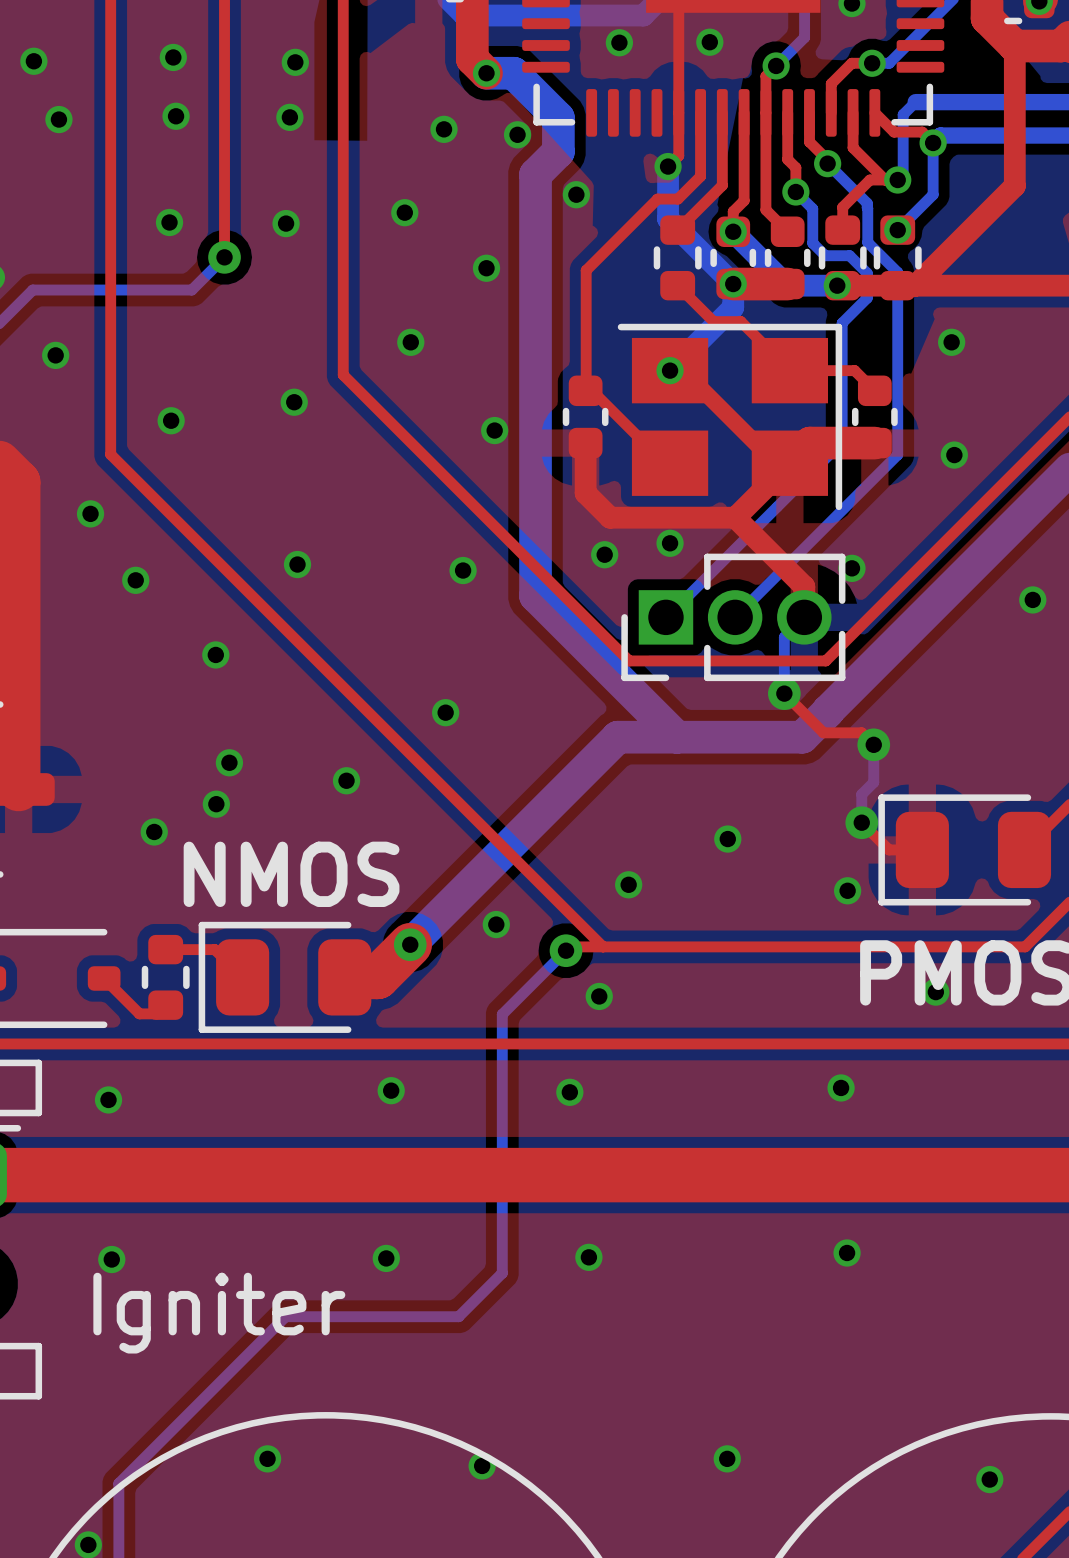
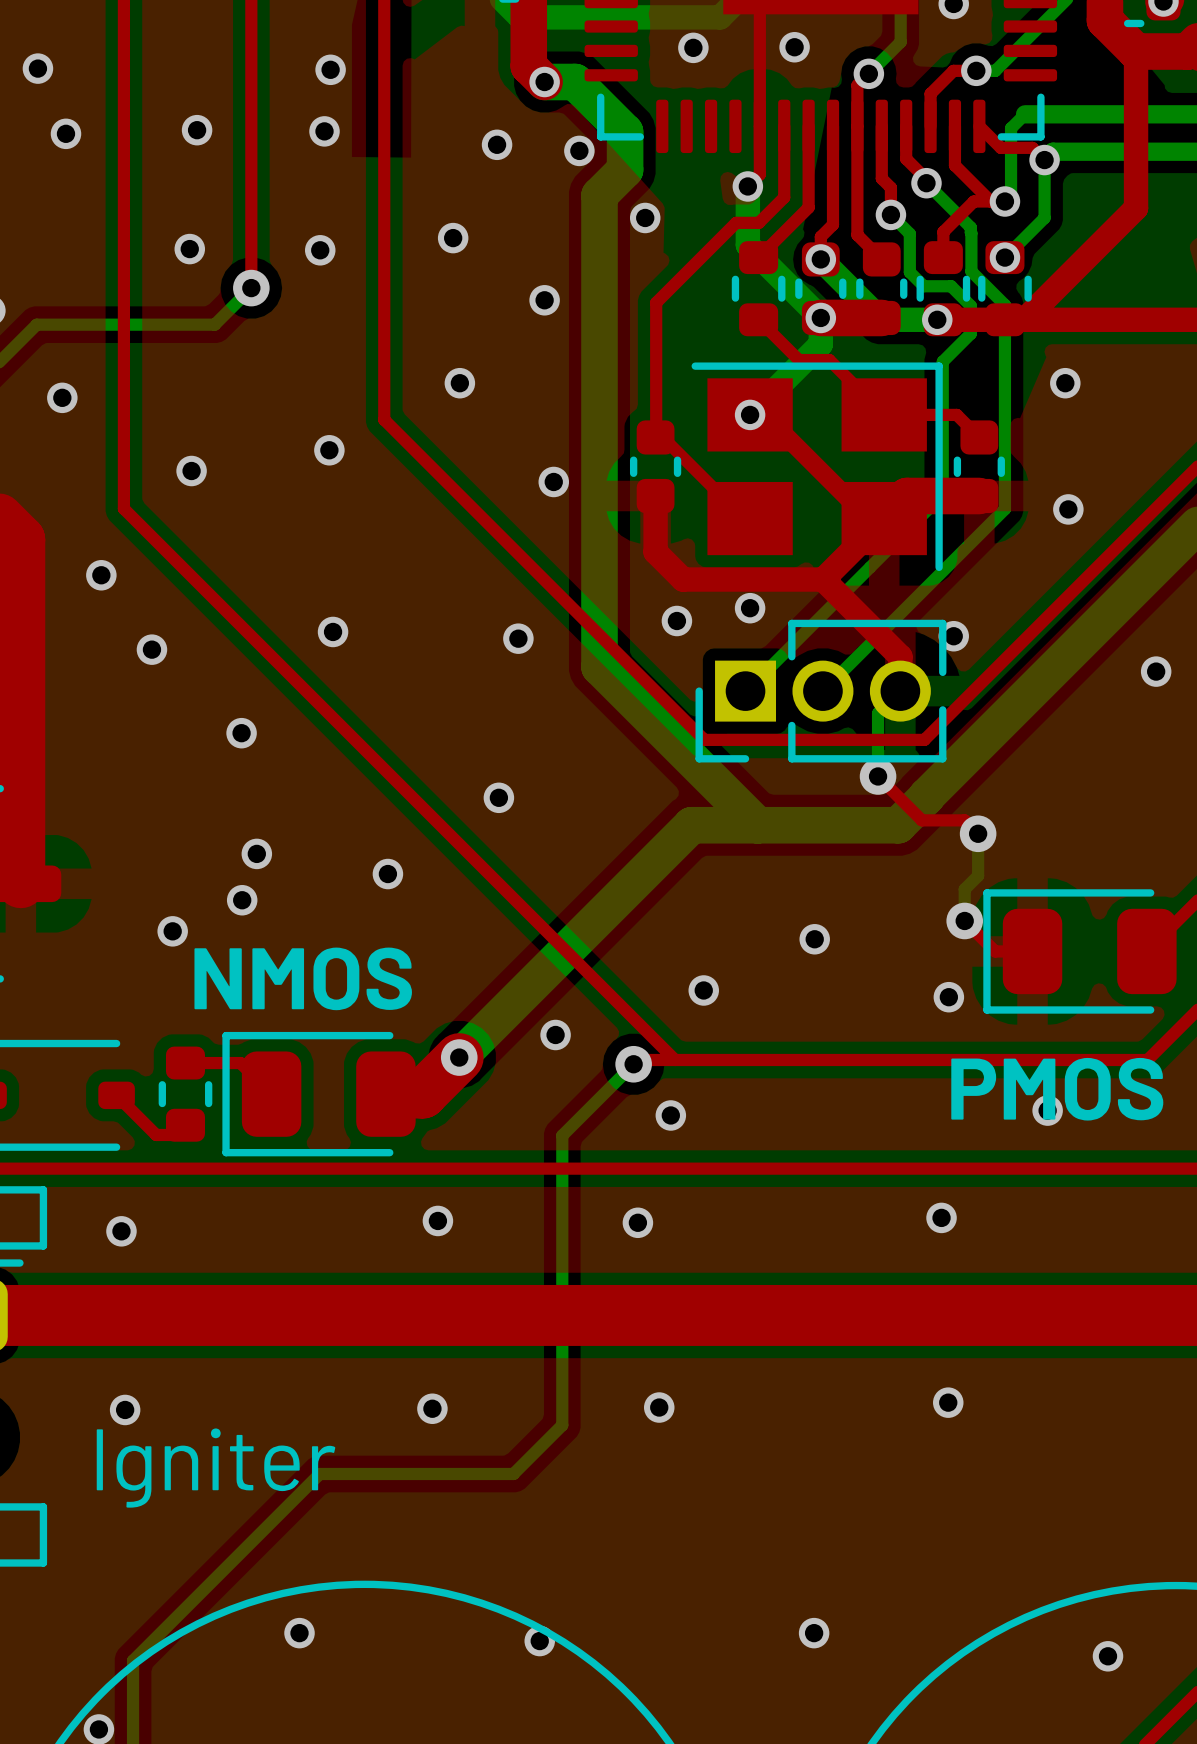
via: (173, 57) -> none

